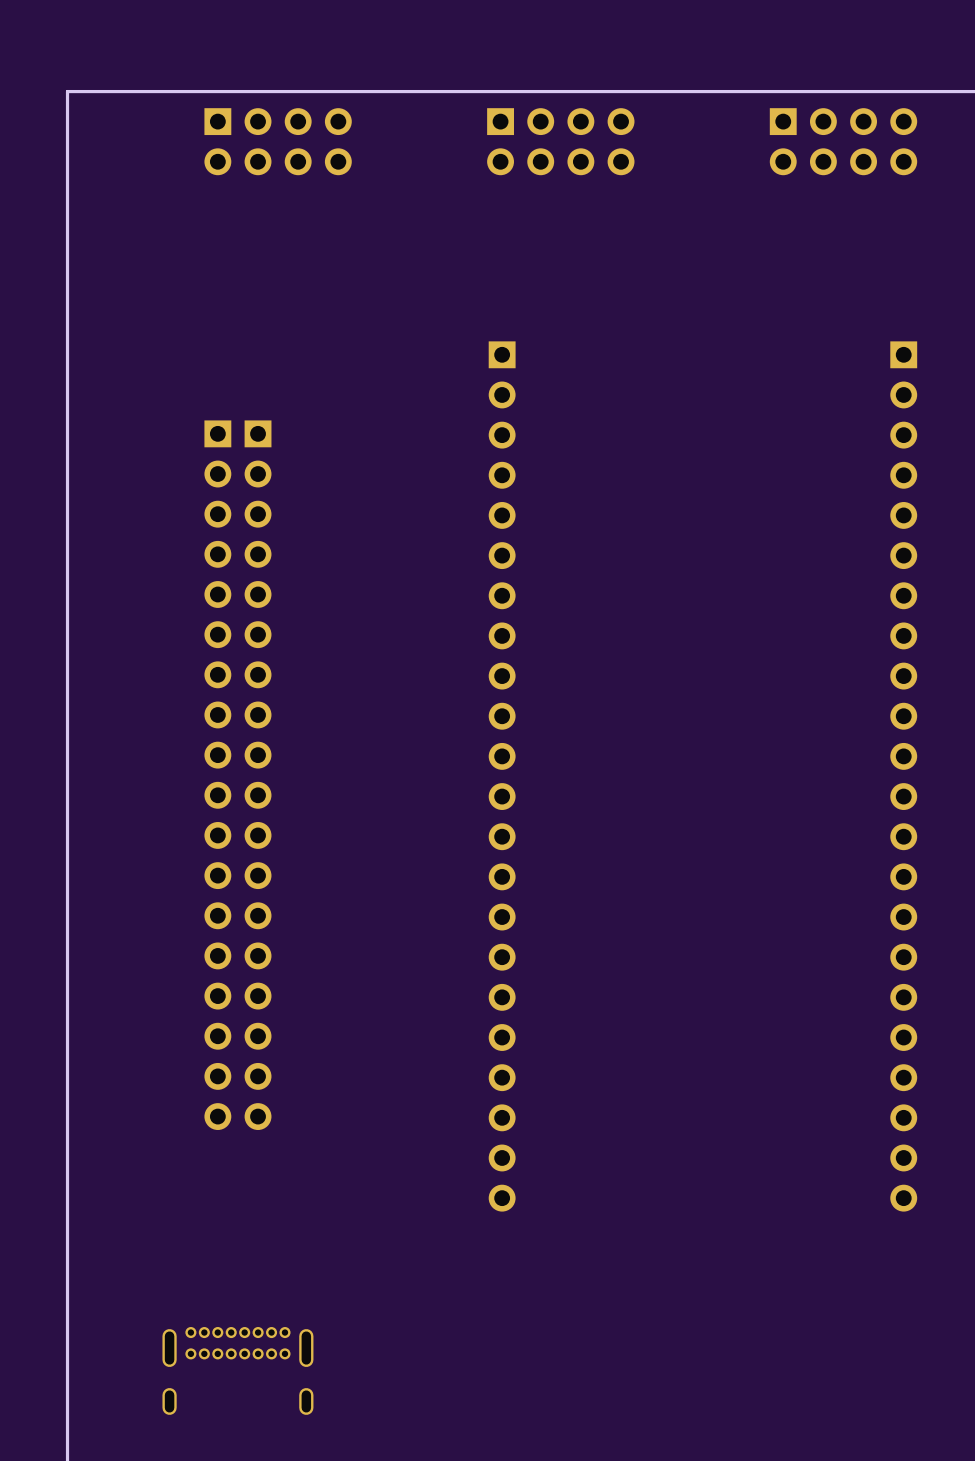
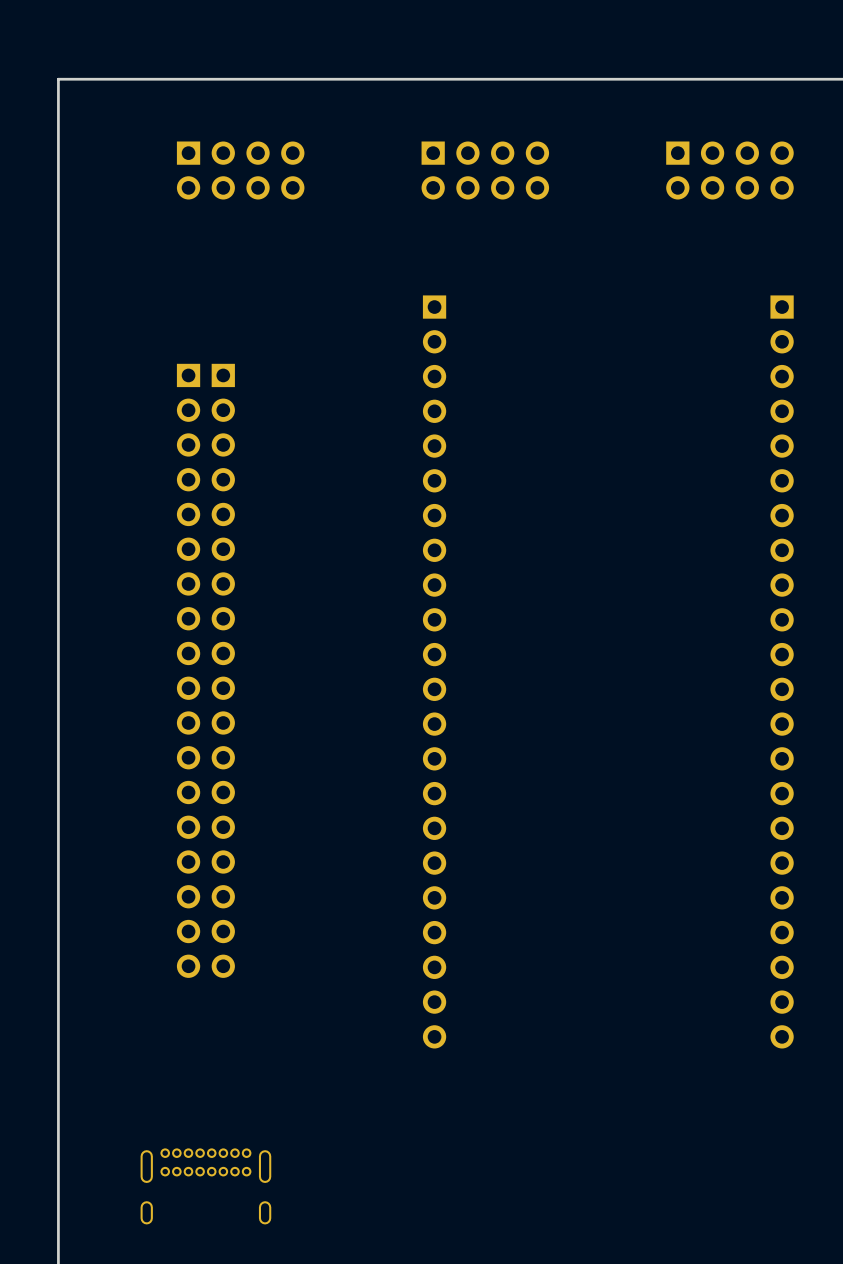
part position: (278, 141) -> (240, 170)
part position: (560, 141) -> (485, 170)
part position: (843, 141) -> (729, 170)

